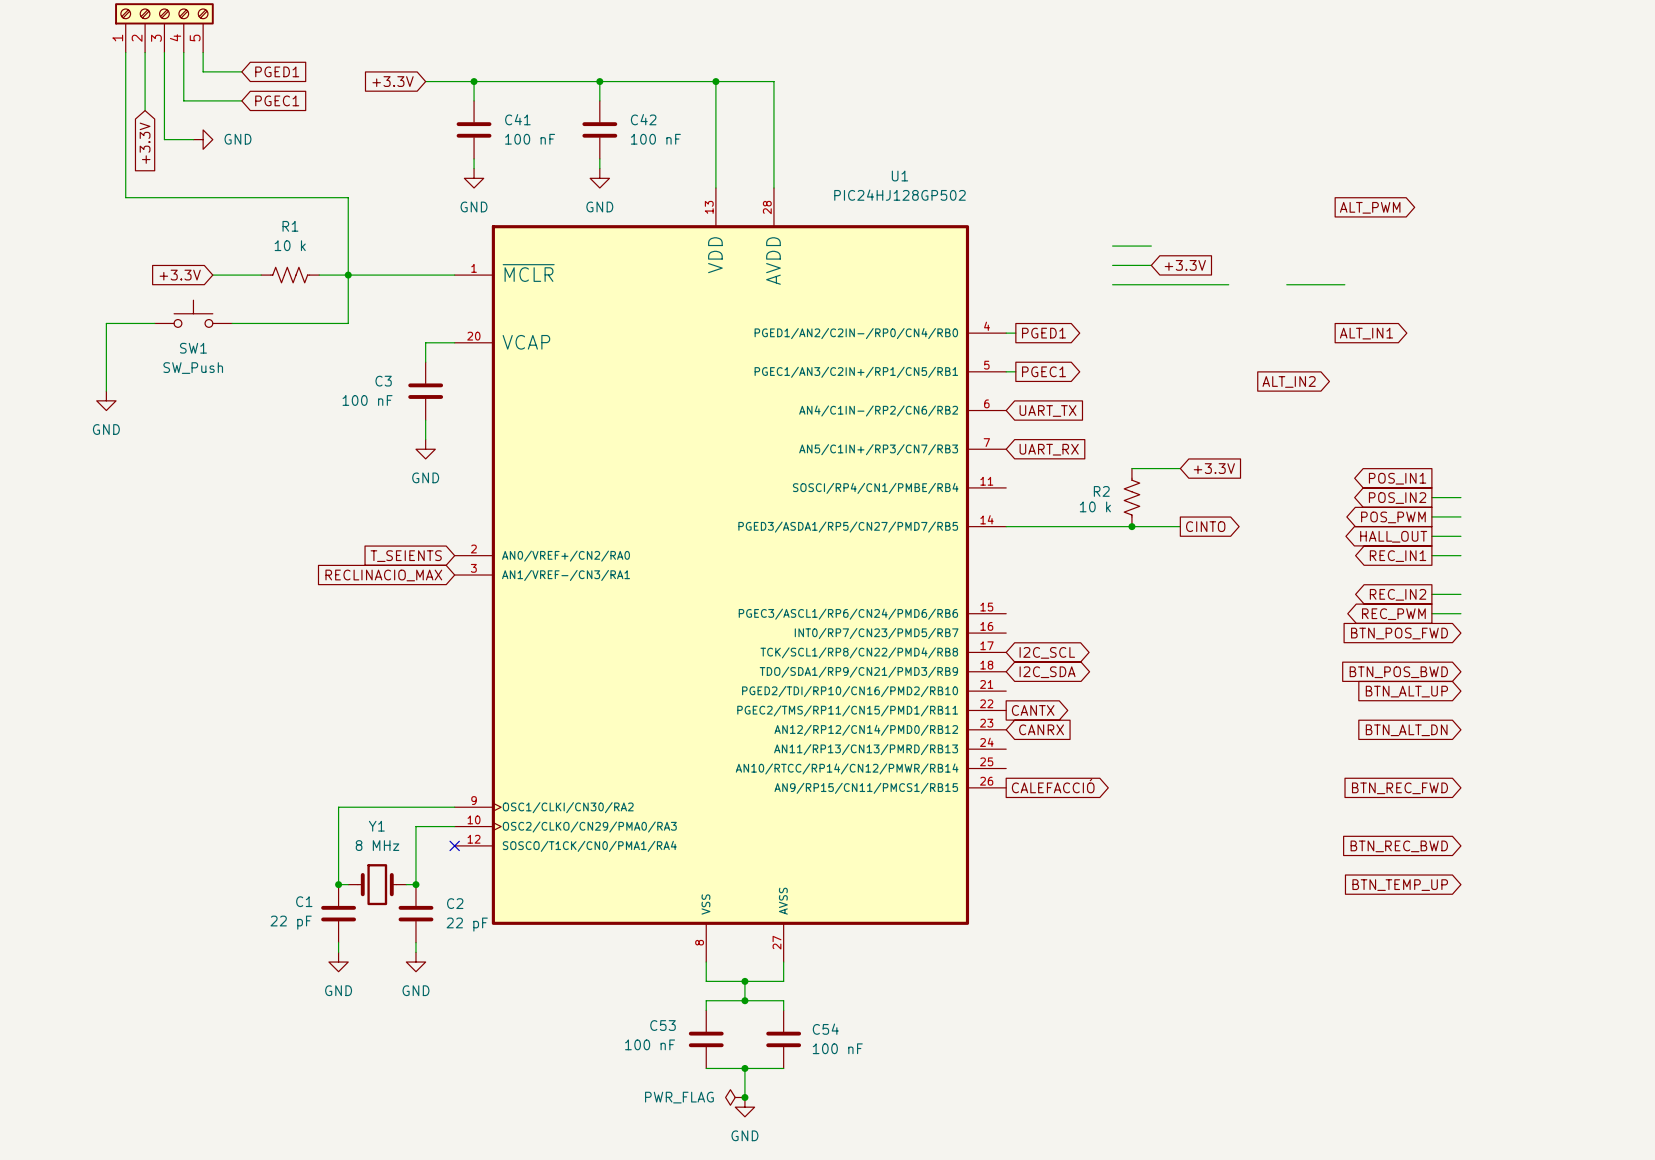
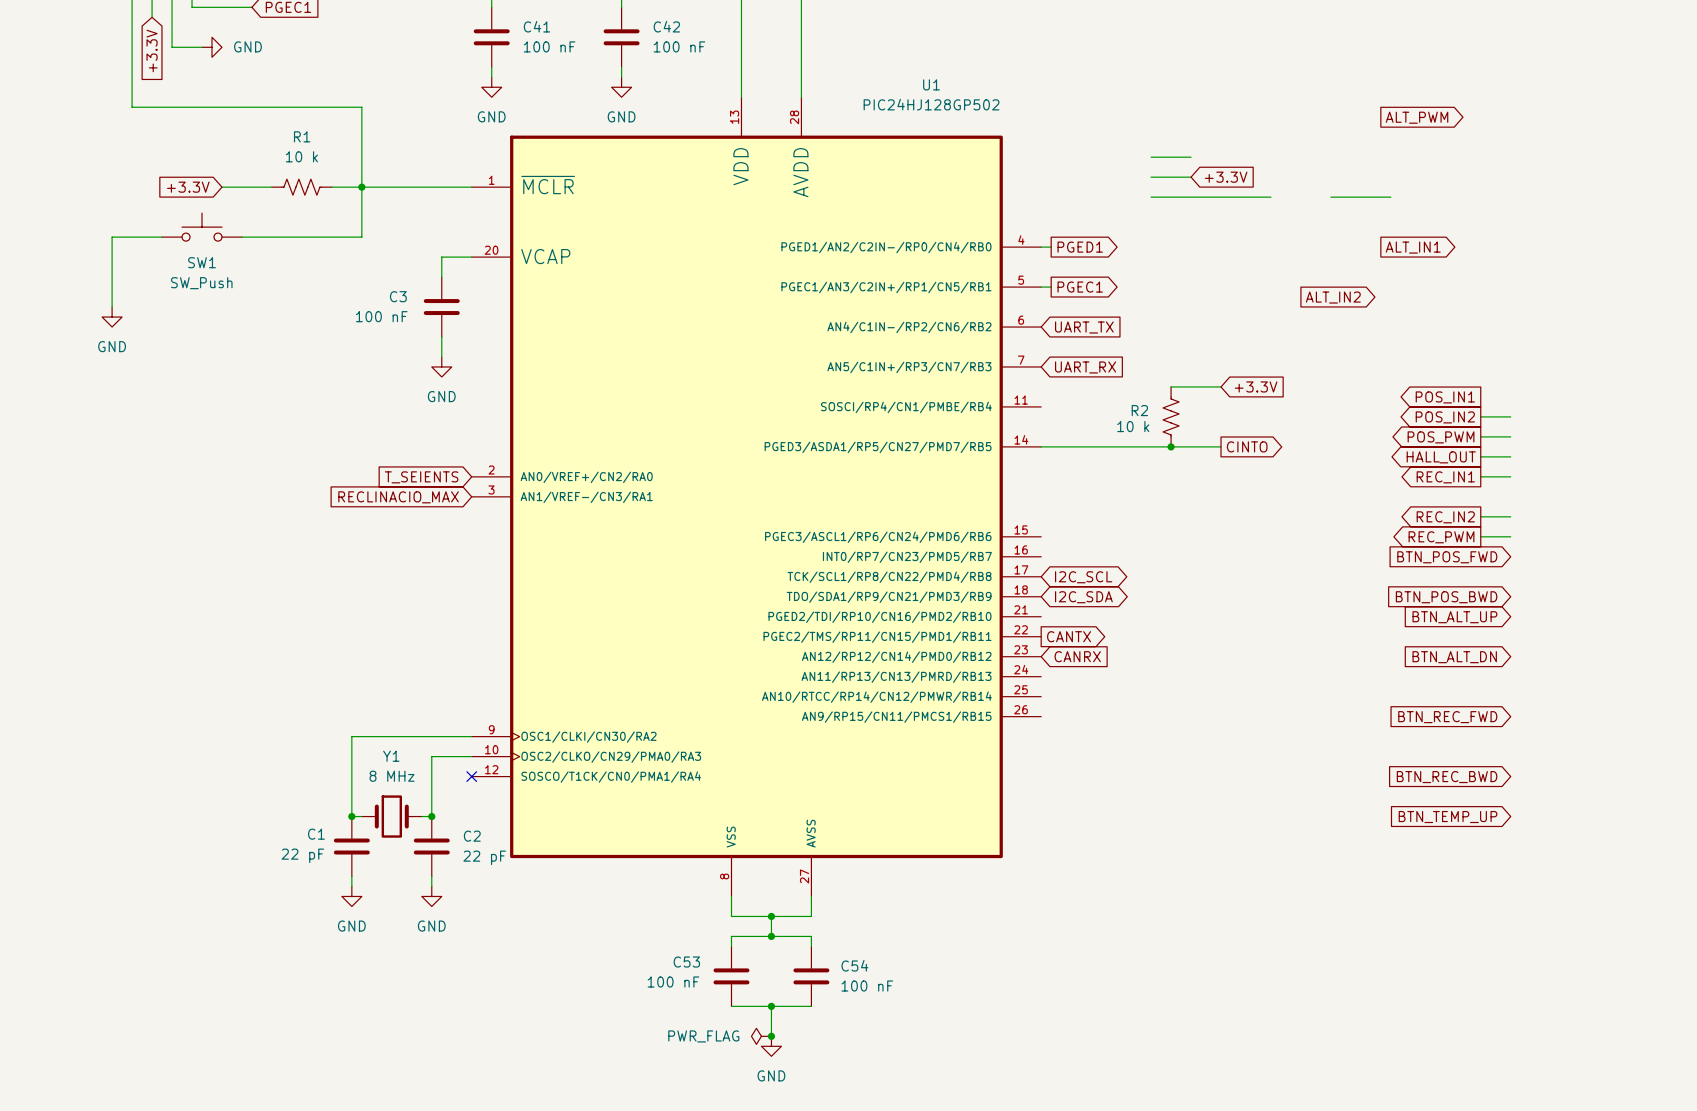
global label: CALEFACCIÓ (1053, 786) -> none

